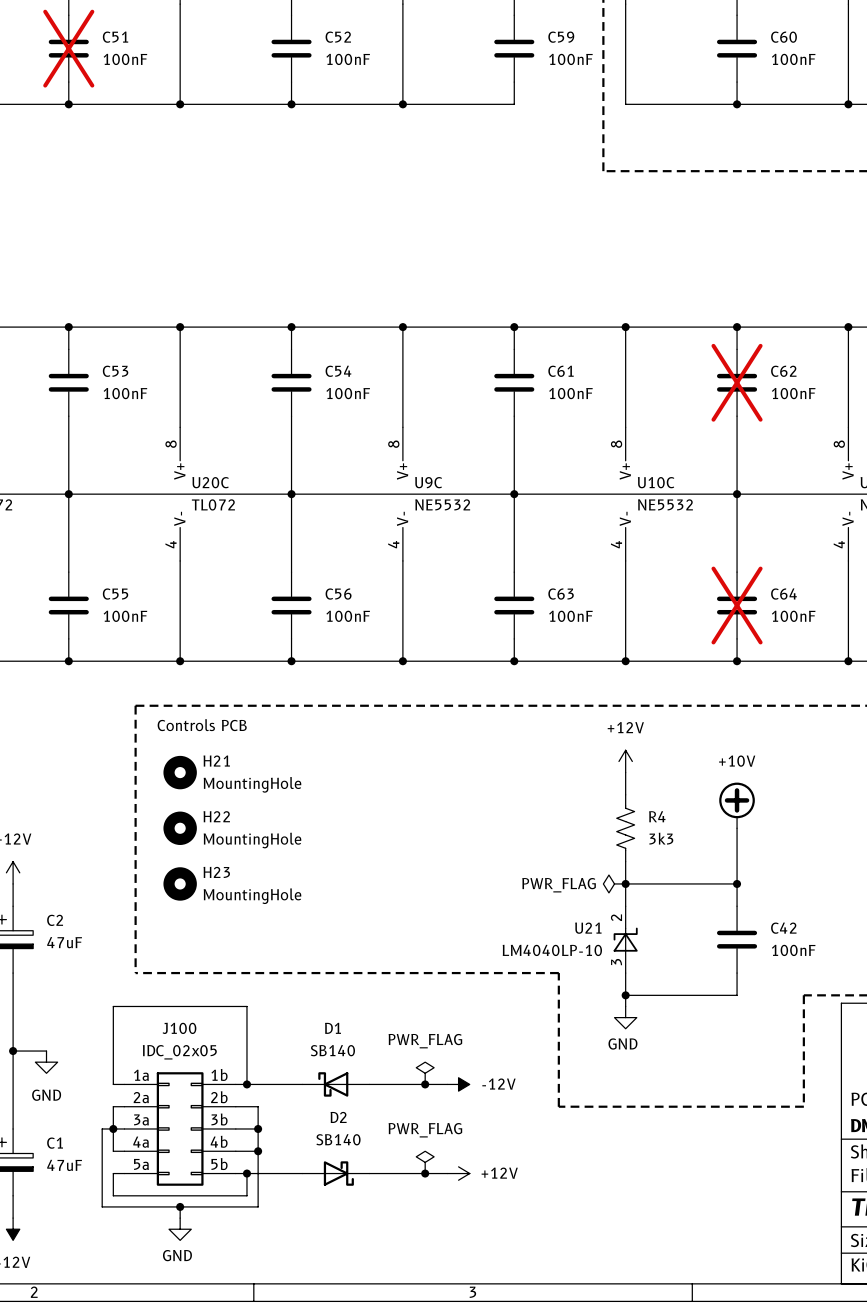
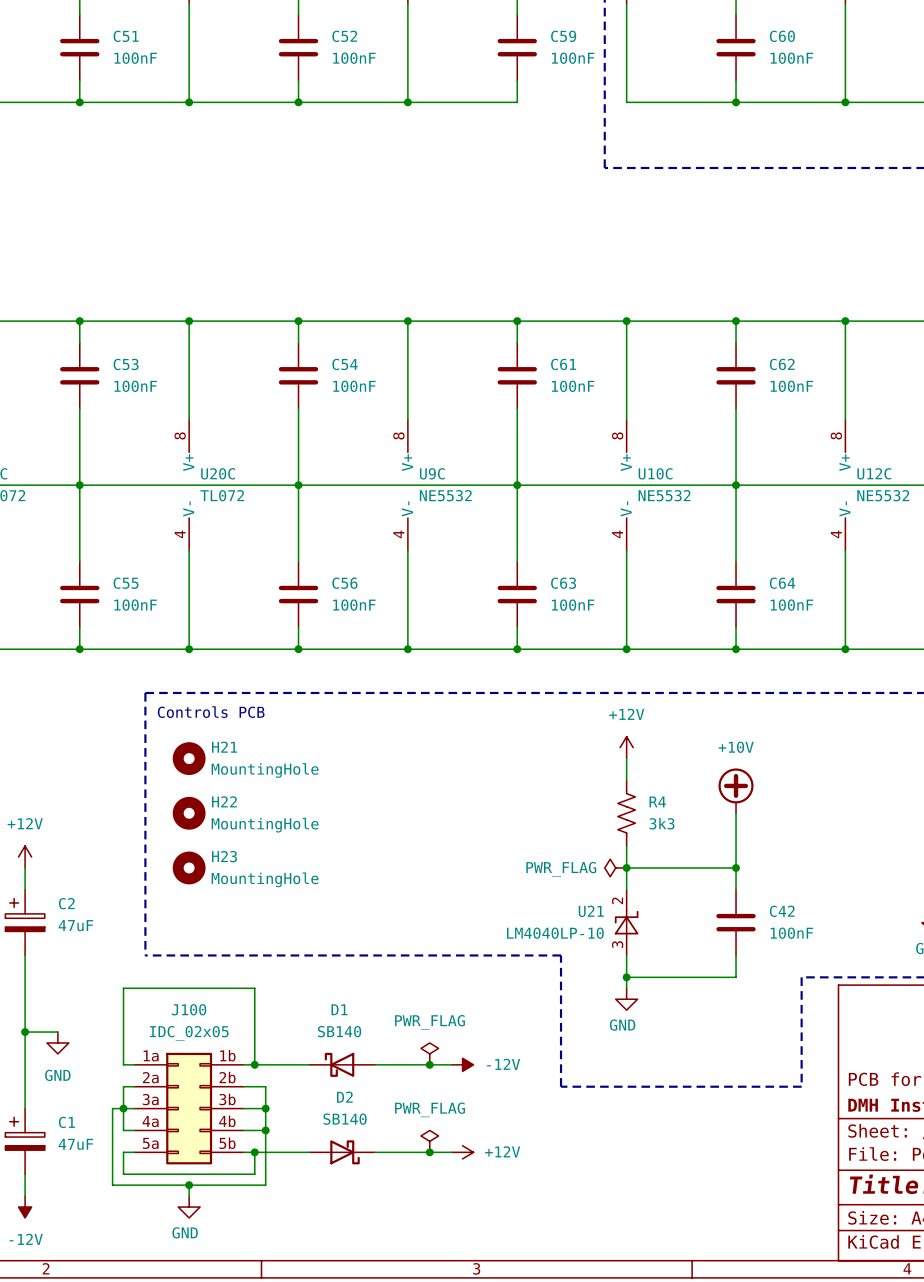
C51 do-not-place cross: (68, 48) -> none
C62 do-not-place cross: (737, 382) -> none
C64 do-not-place cross: (737, 605) -> none

